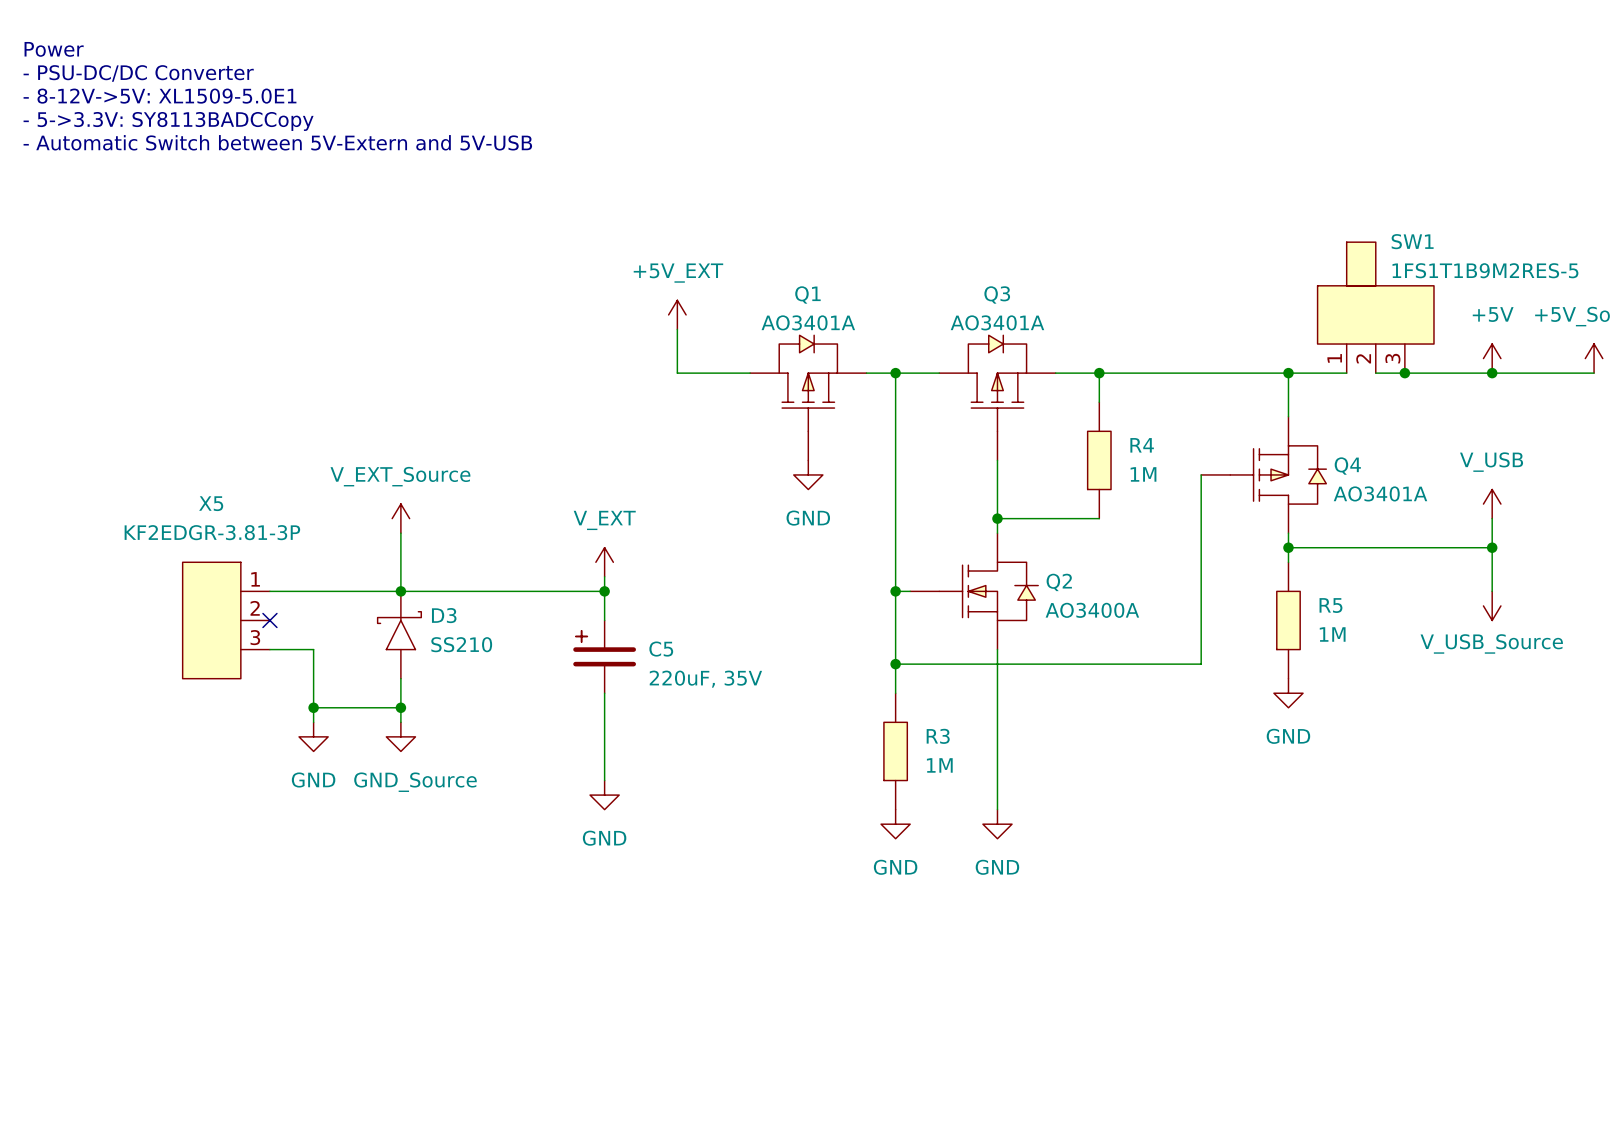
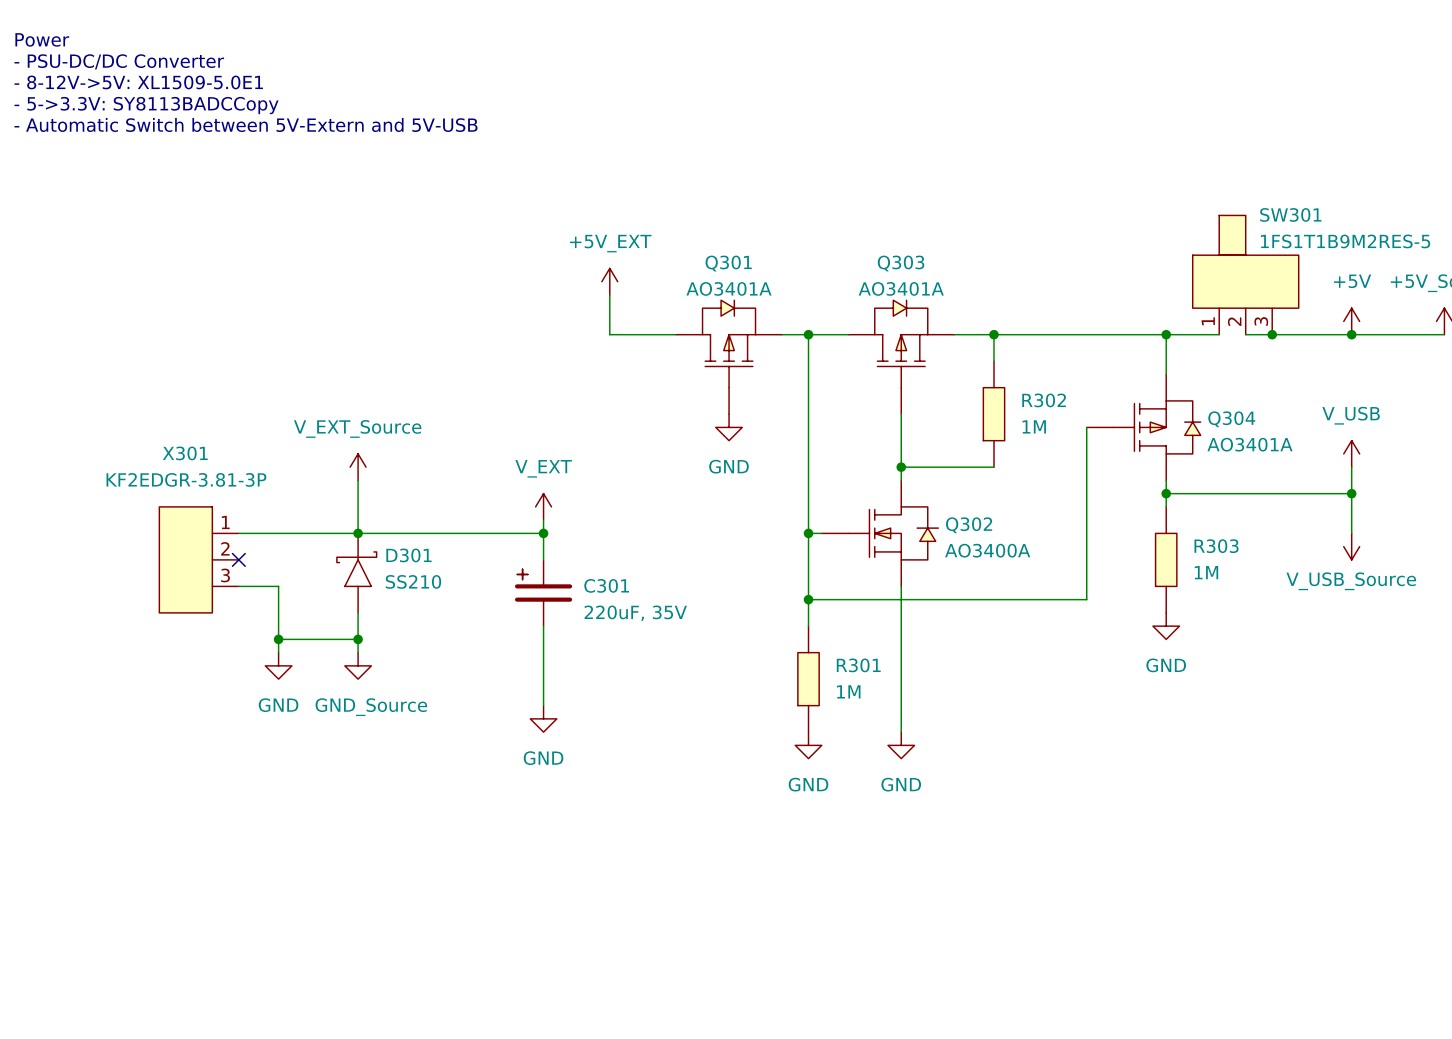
SW1 name: SW1 (1412, 241) -> SW301 (1290, 214)
Q1 name: Q1 (807, 294) -> Q301 (728, 263)
Q3 name: Q3 (997, 294) -> Q303 (901, 263)
R4 name: R4 (1142, 445) -> R302 (1044, 400)
Q4 name: Q4 (1347, 466) -> Q304 (1231, 419)
X5 name: X5 (211, 503) -> X301 (185, 453)
Q2 name: Q2 (1059, 582) -> Q302 (969, 525)
R5 name: R5 (1330, 605) -> R303 (1216, 546)
D3 name: D3 (444, 615) -> D301 (408, 555)
C5 name: C5 (661, 649) -> C301 (606, 585)
R3 name: R3 (938, 736) -> R301 (858, 665)

